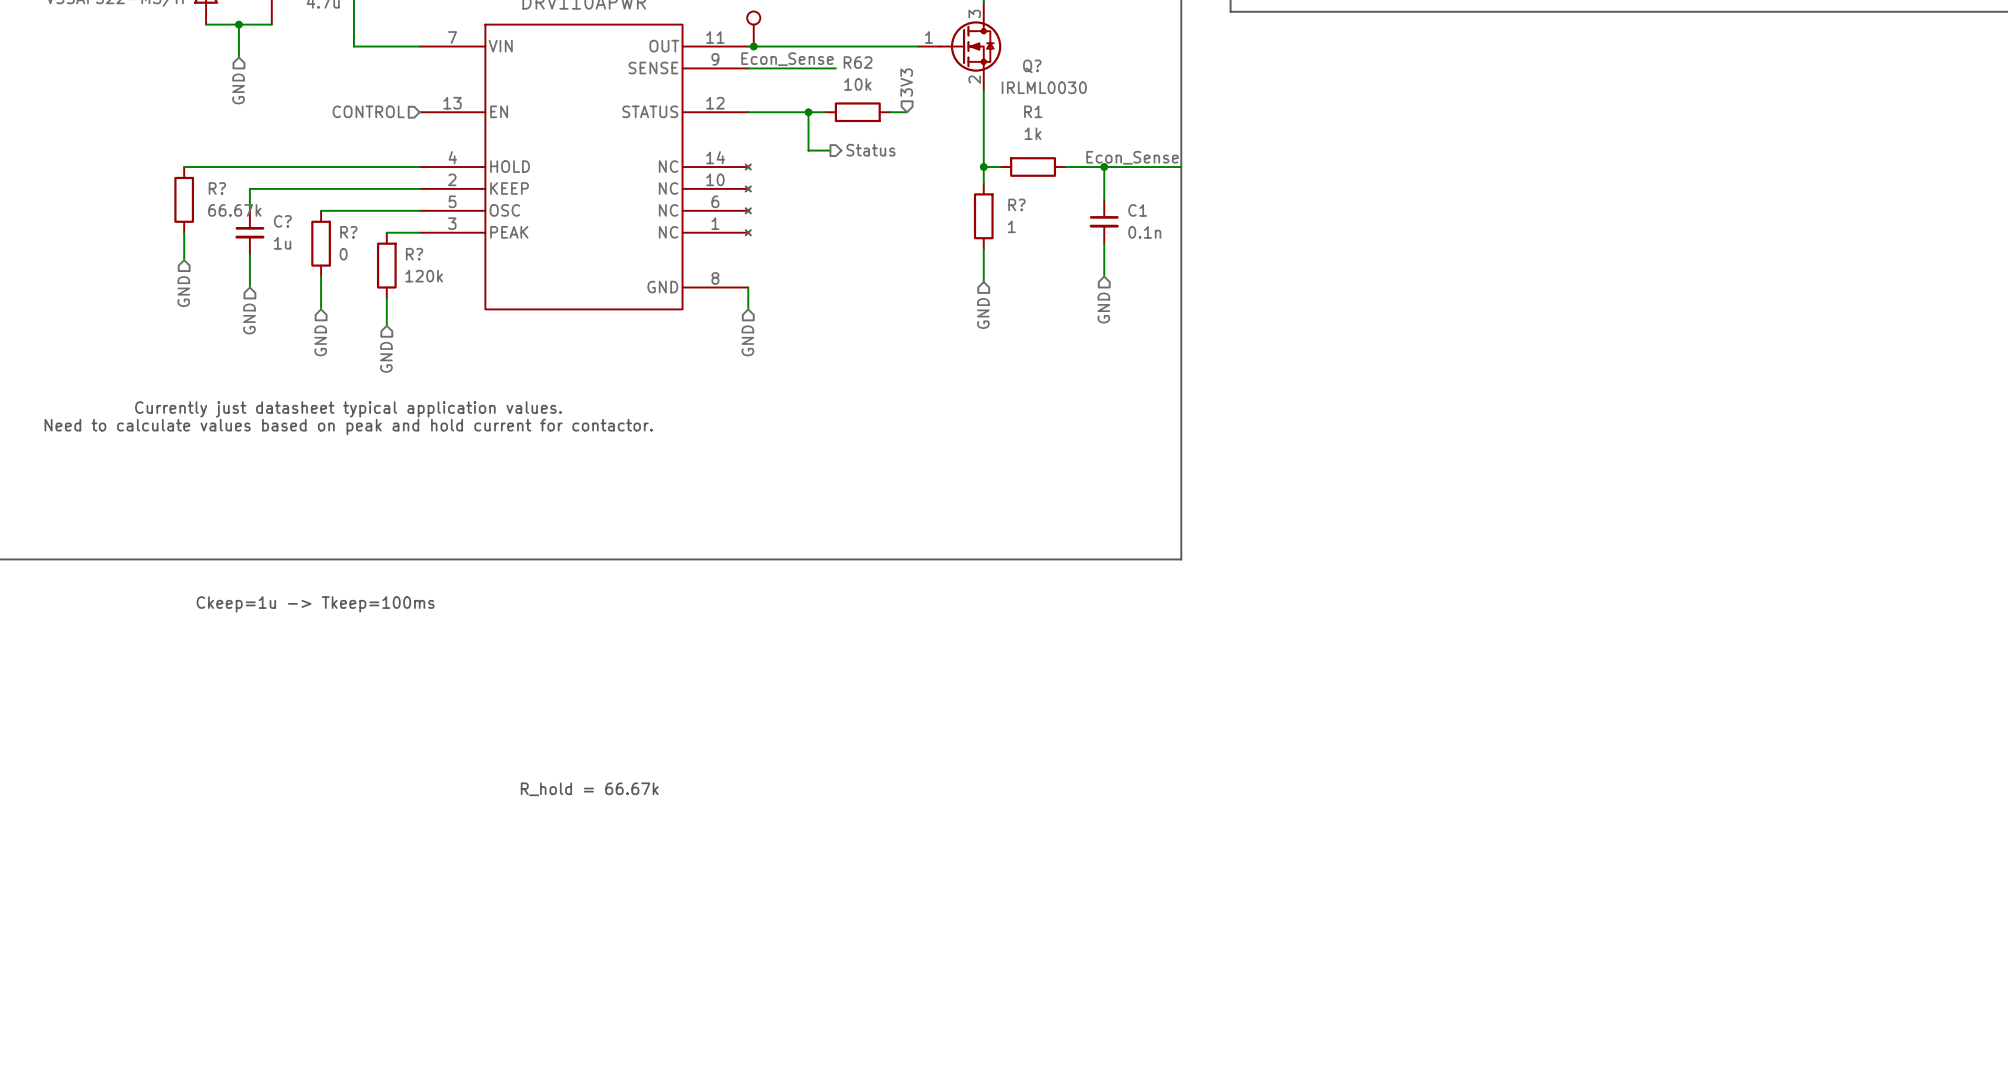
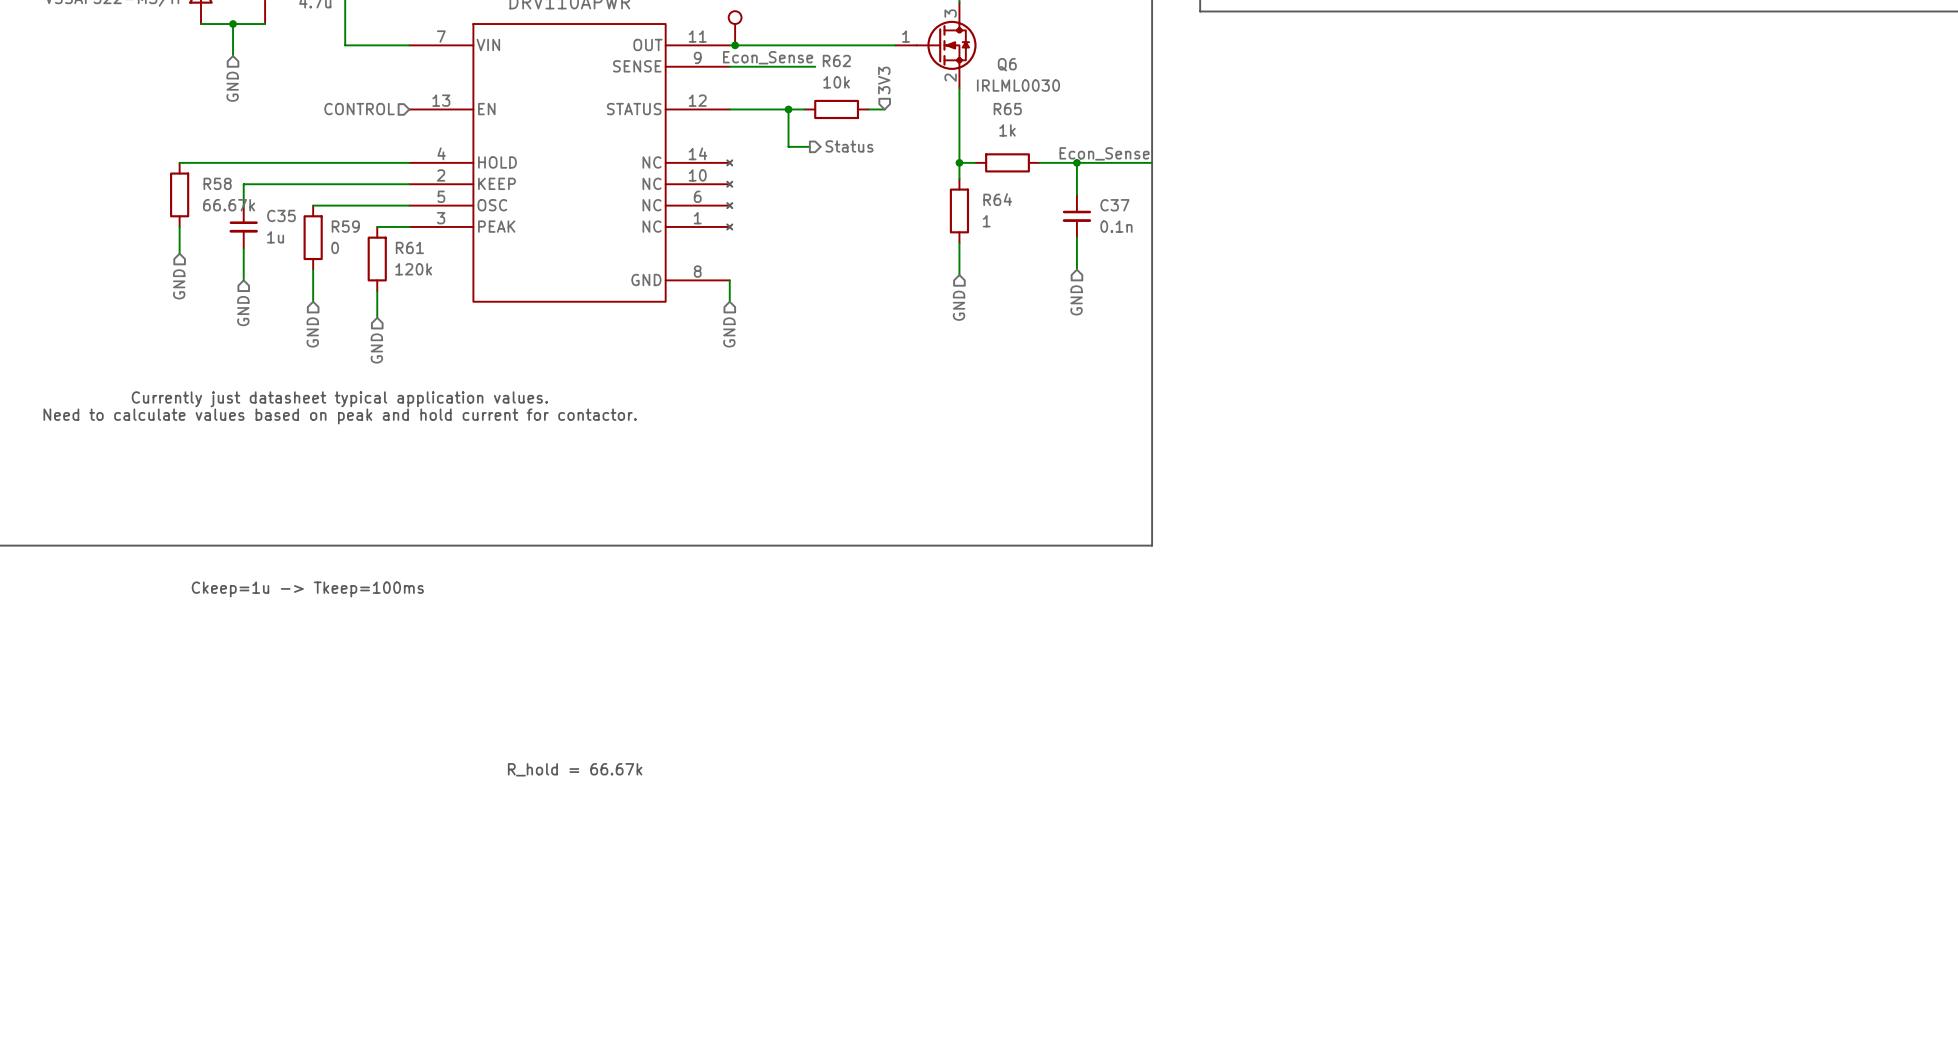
Q? name: Q? (1032, 66) -> Q6 (1007, 64)
R1 name: R1 (1033, 111) -> R65 (1007, 109)
R? name: R? (217, 188) -> R58 (217, 183)
R? name: R? (1016, 204) -> R64 (997, 199)
C1 name: C1 (1137, 210) -> C37 (1114, 205)
C? name: C? (282, 221) -> C35 (281, 215)
R? name: R? (348, 232) -> R59 (345, 226)
R? name: R? (414, 254) -> R61 (409, 247)

